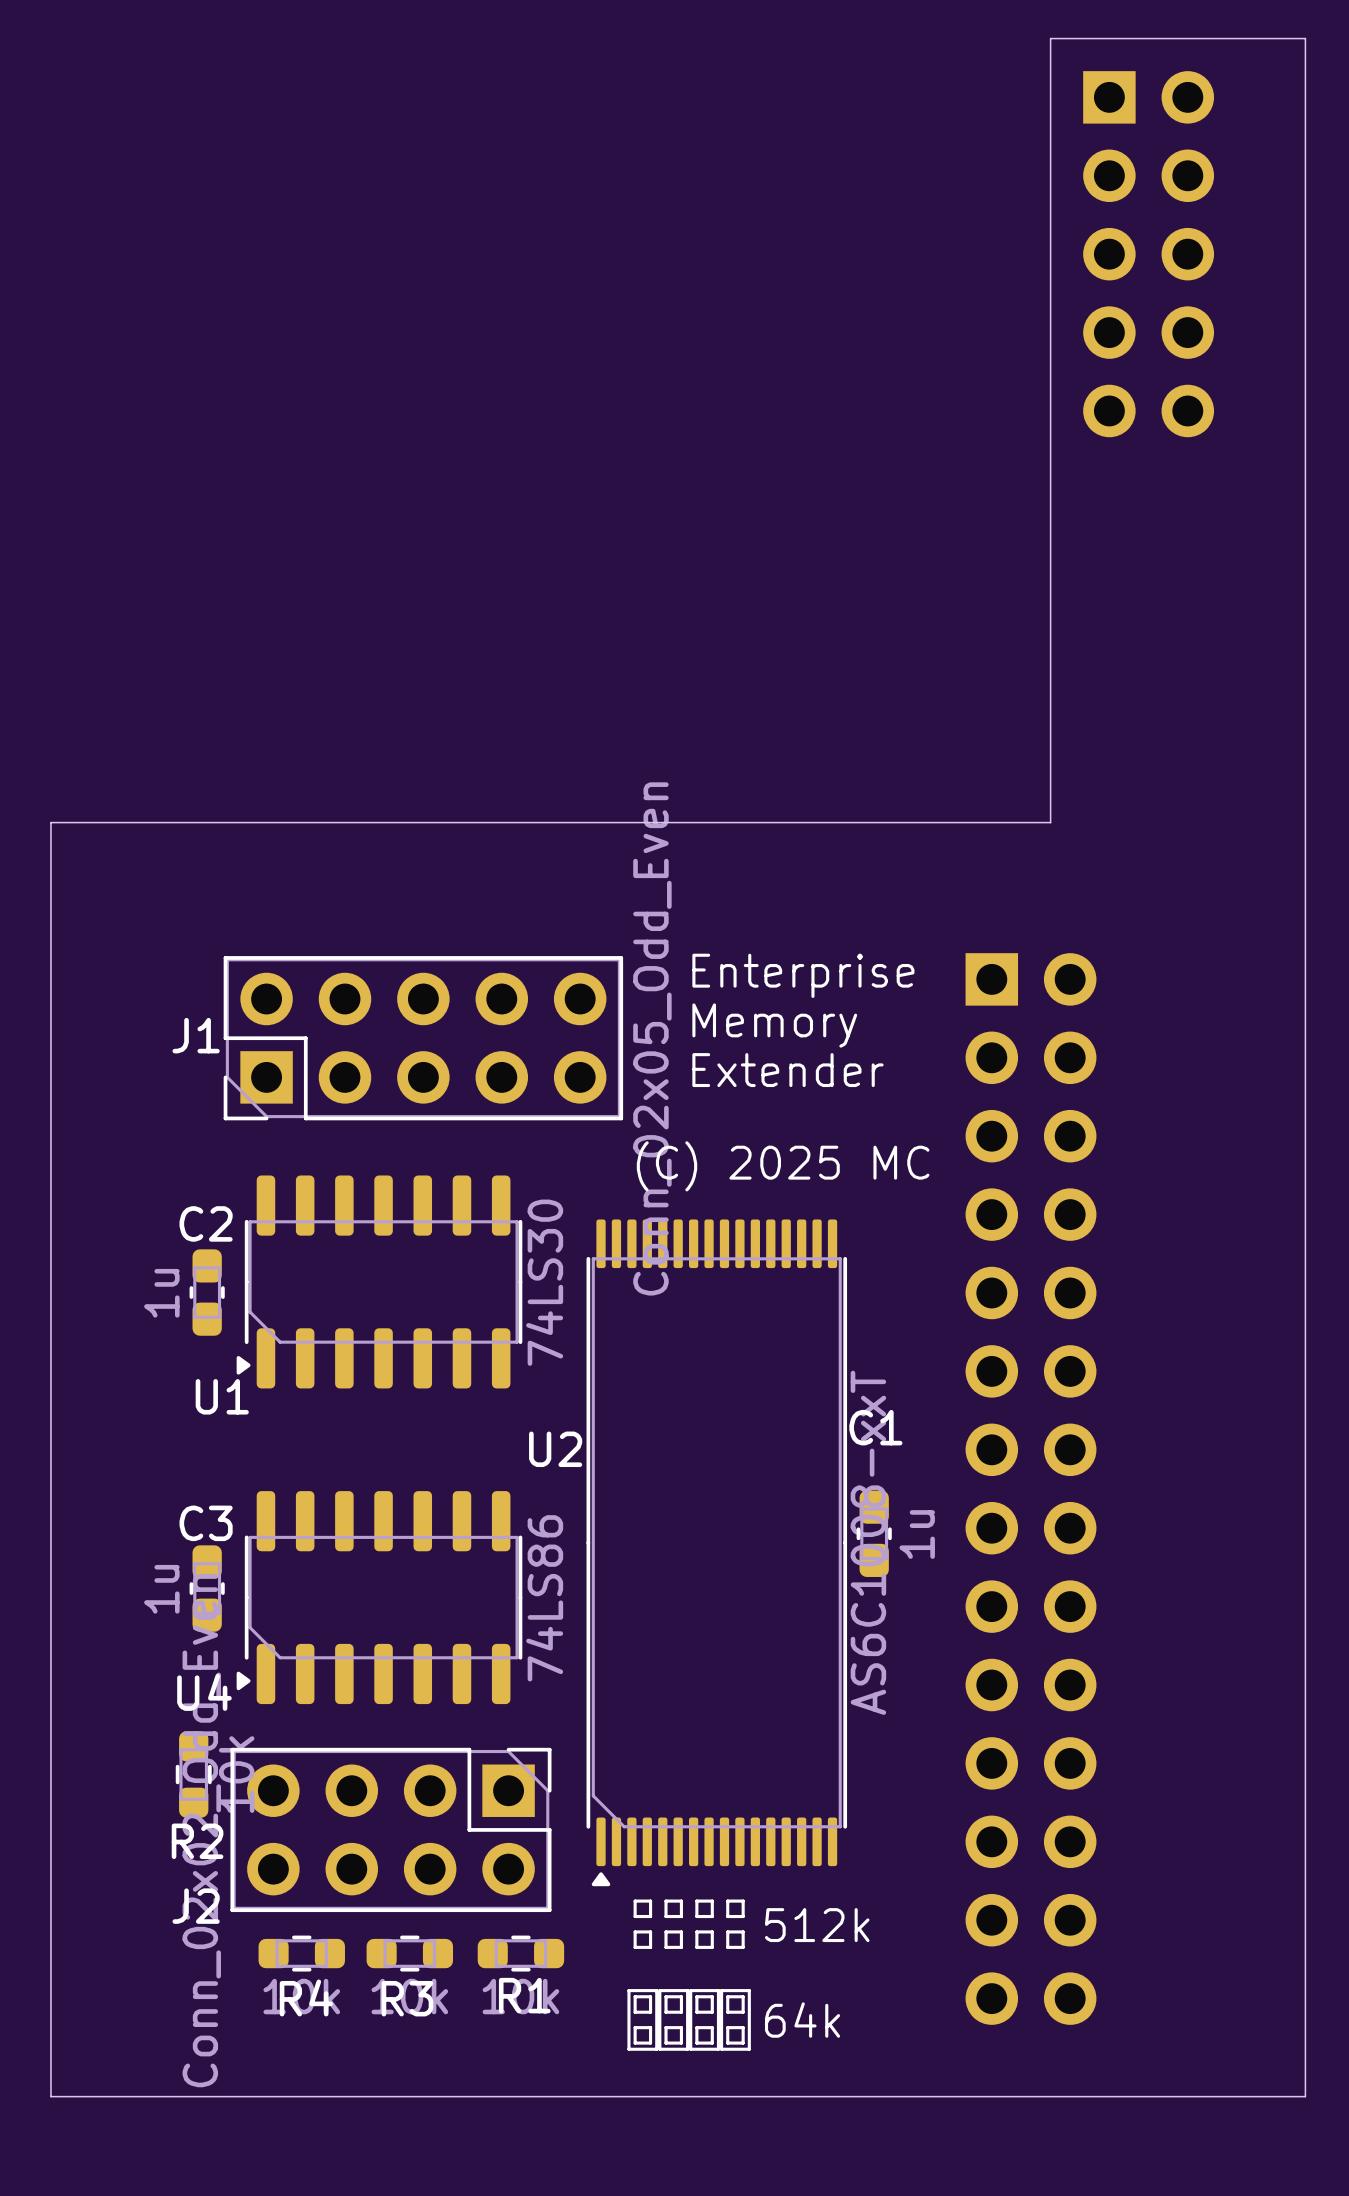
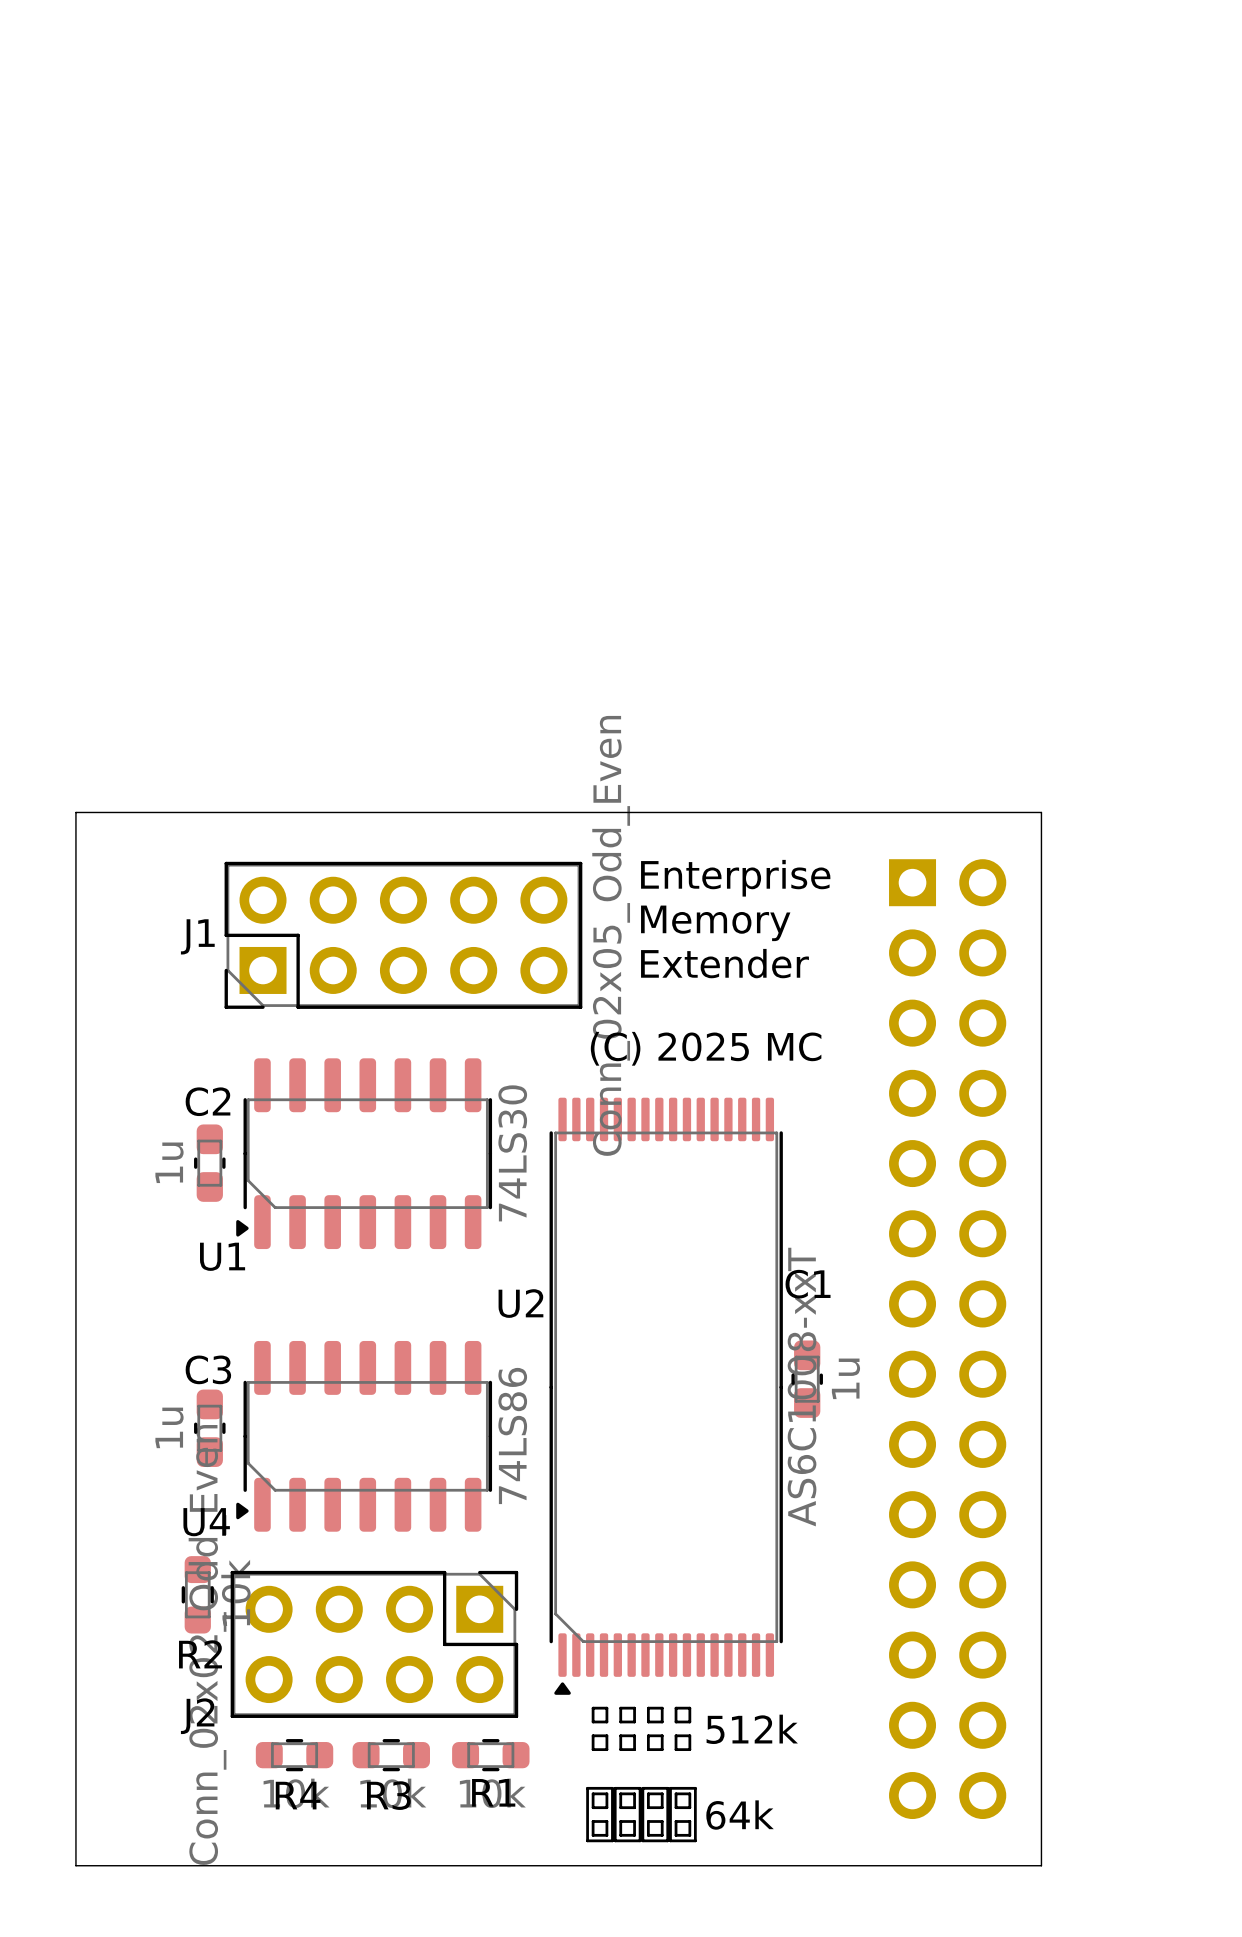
board edge: (1050, 38) (1050, 822) (50, 822) (50, 2096) (1305, 2096) (1305, 38) (1050, 38) -> none
part: (1148, 254) -> none
board edge: none -> (75, 812) (1041, 812) (1041, 1865) (75, 1865) (75, 812)

